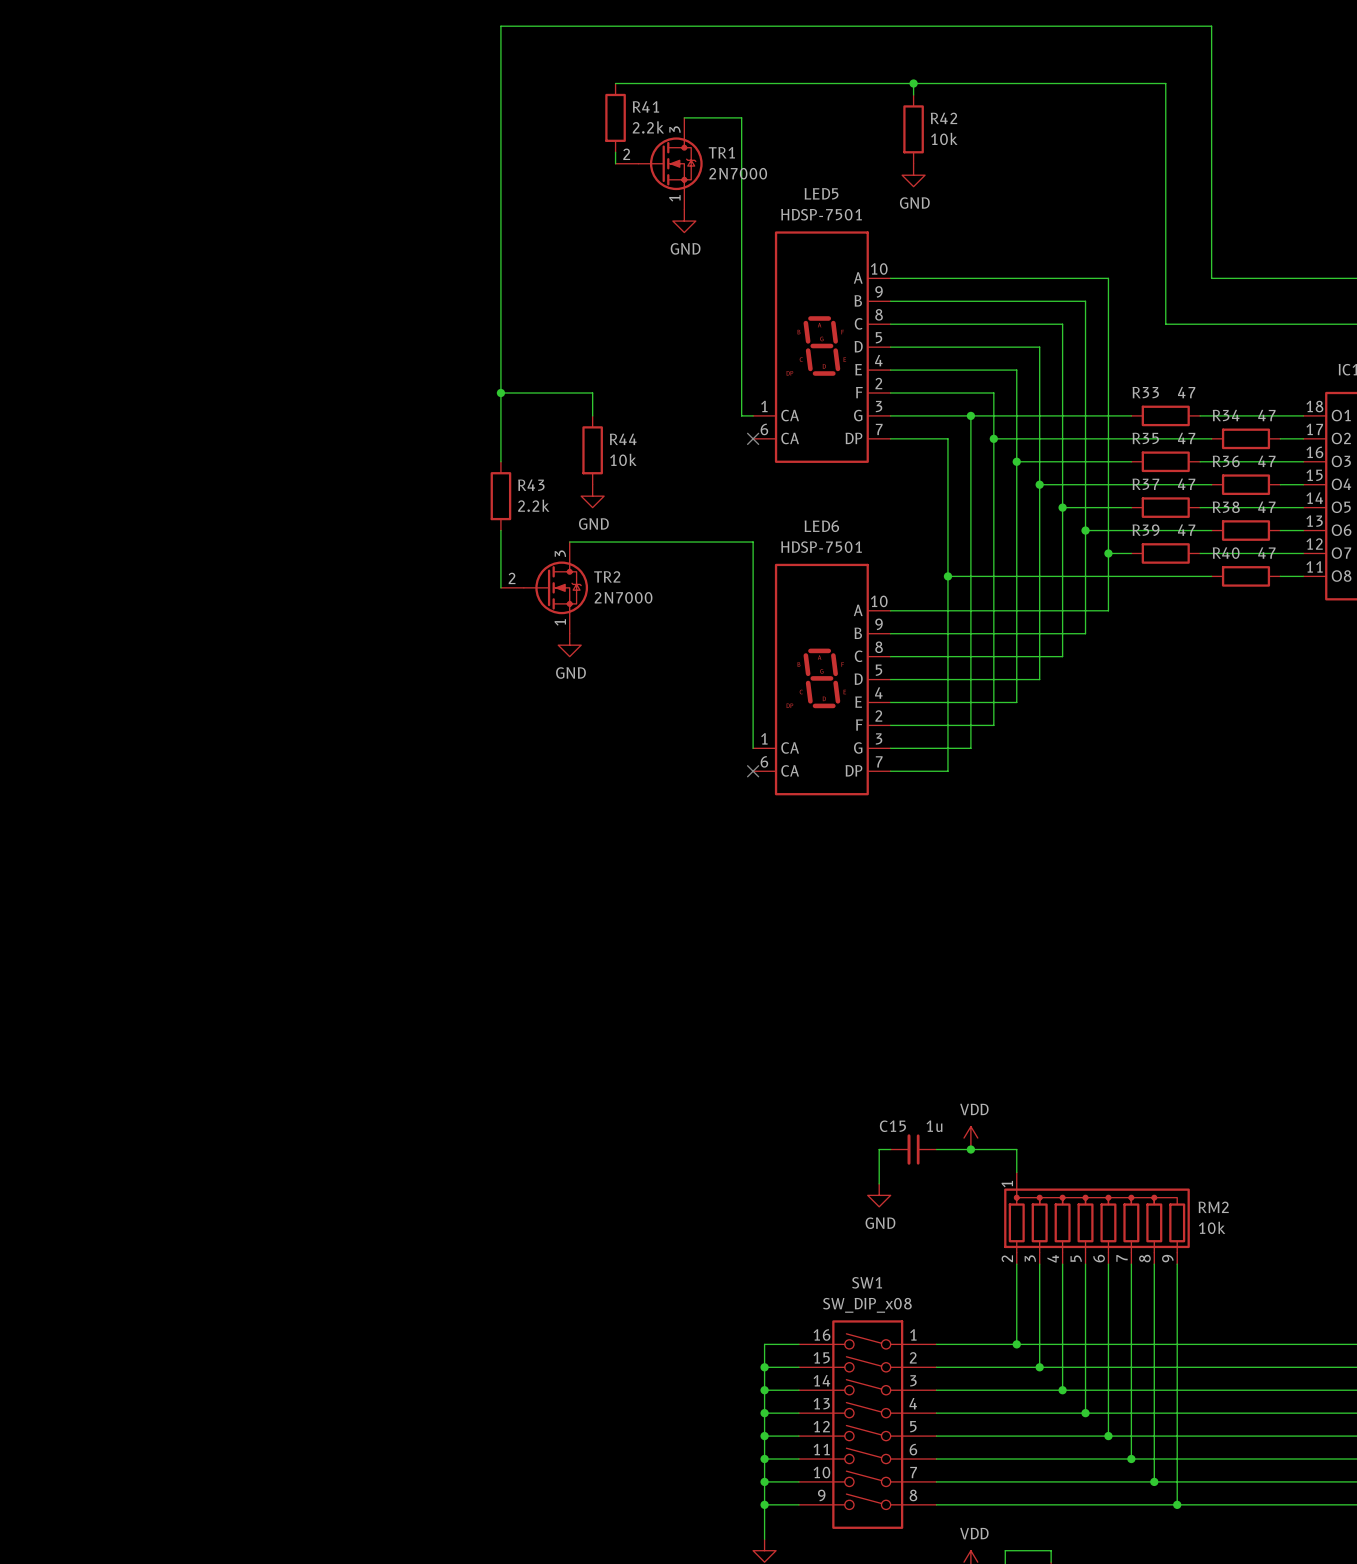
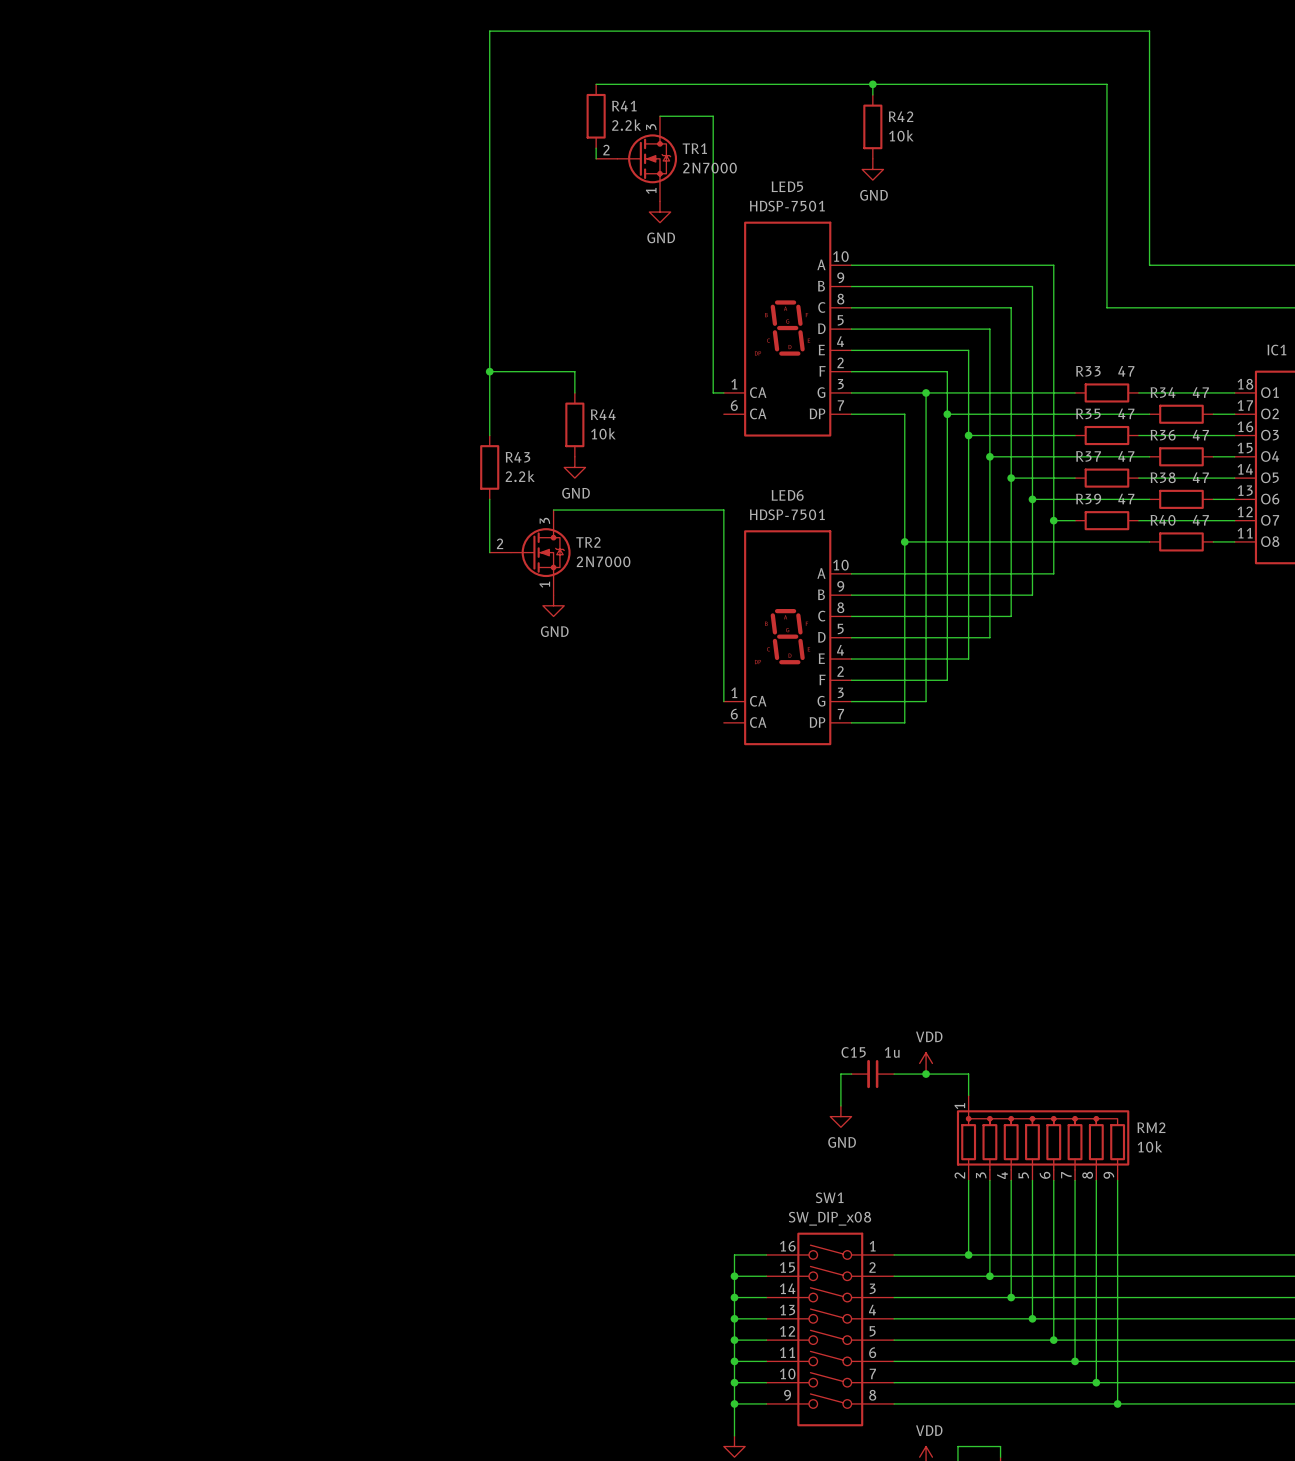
no-connect mark: (753, 438) -> none
no-connect mark: (753, 771) -> none

